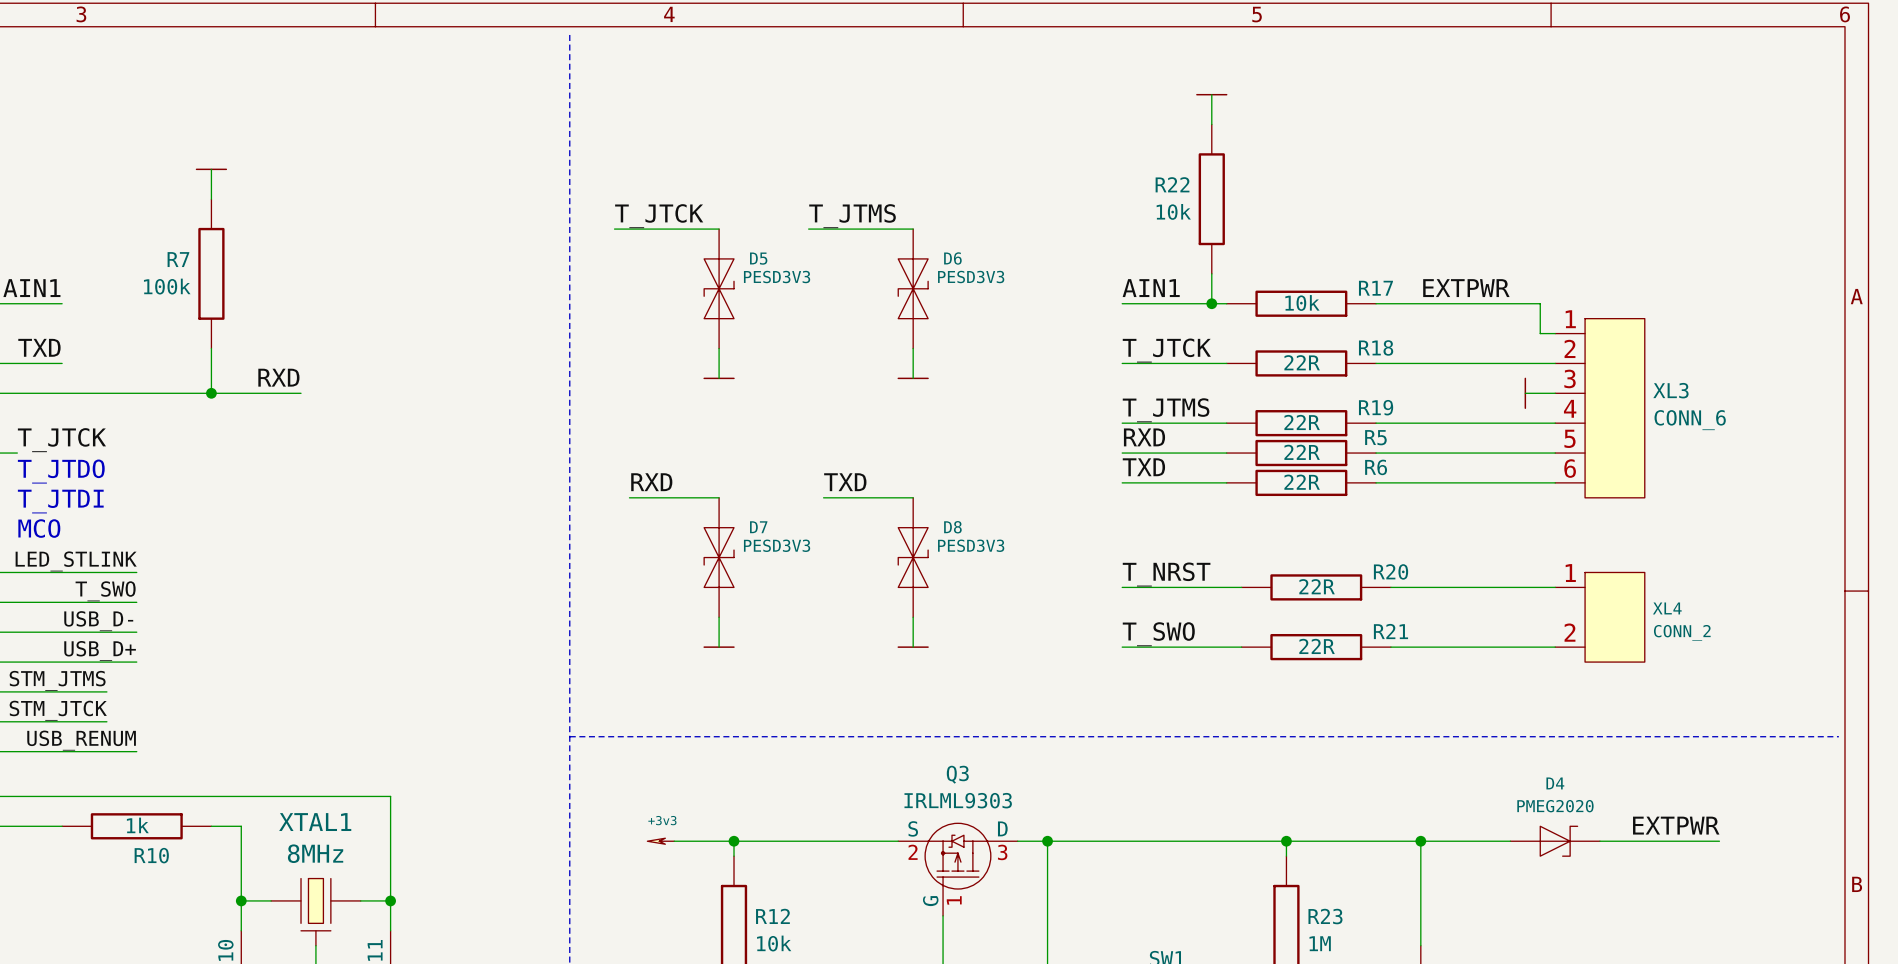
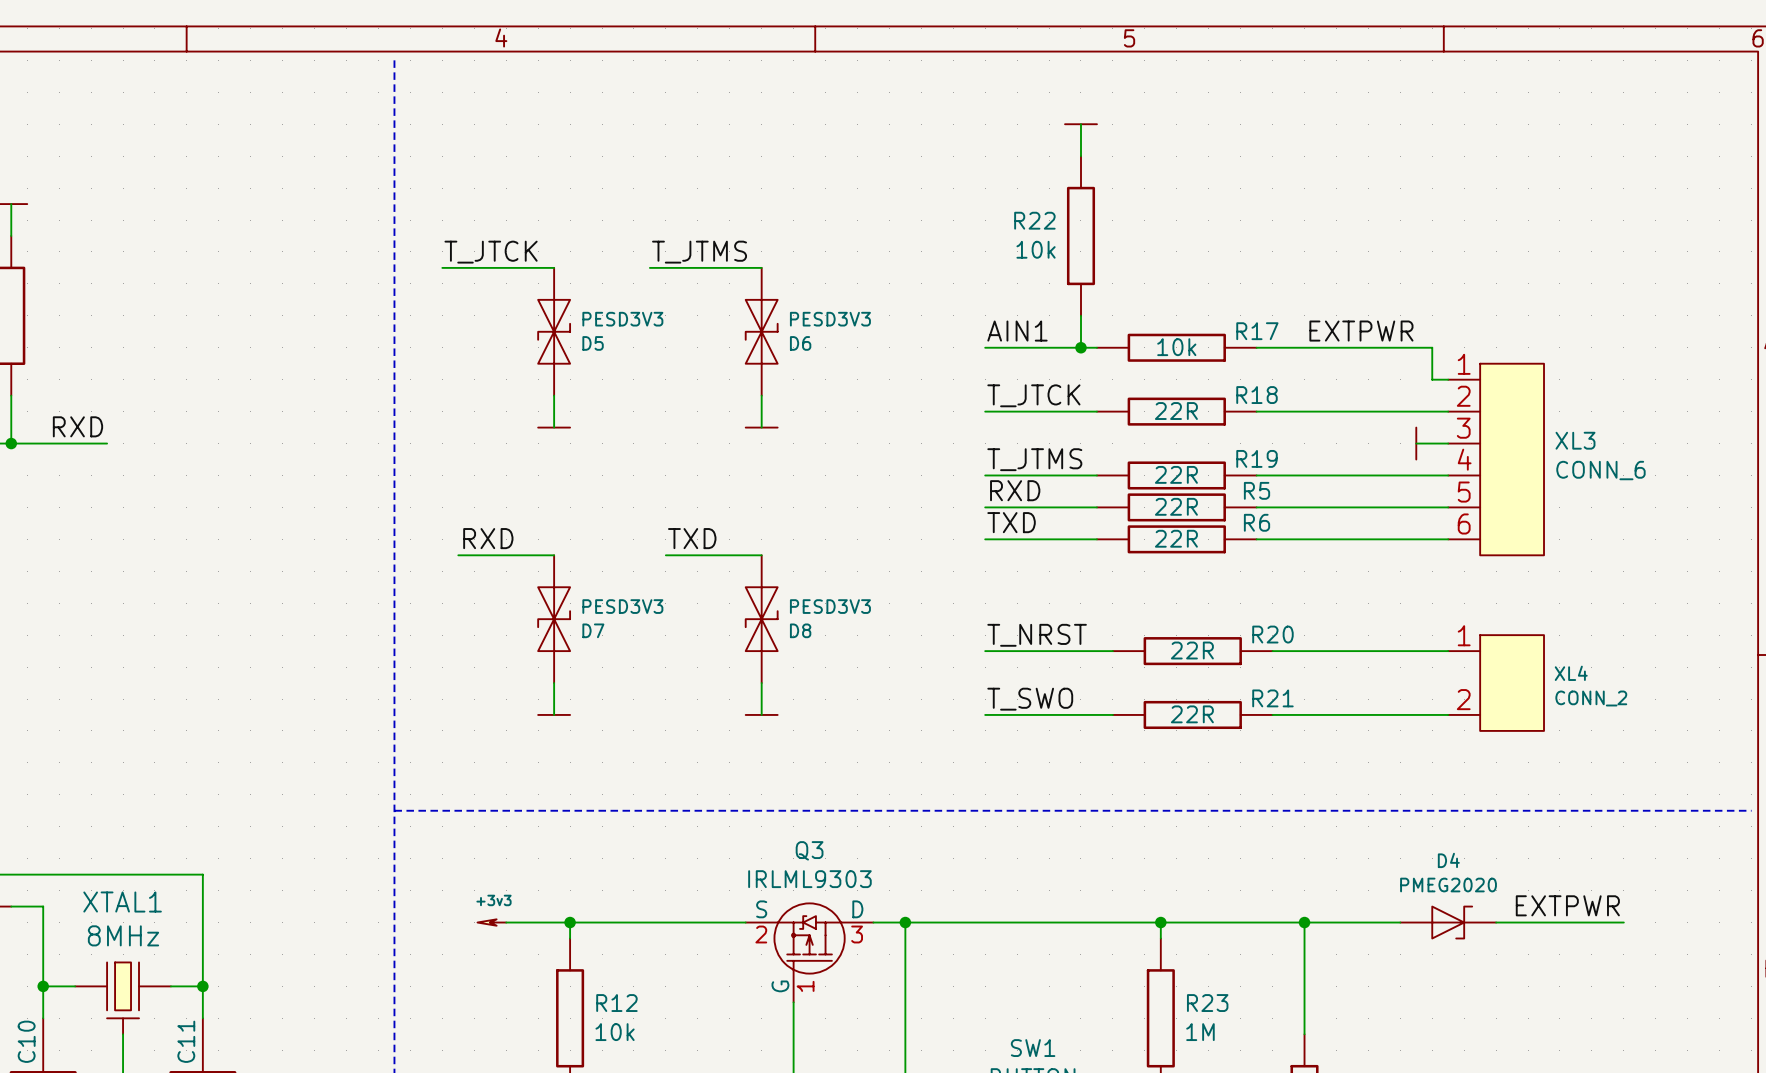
D5 name position: D5 (758, 258) -> D5 (593, 343)
D6 name position: D6 (952, 258) -> D6 (800, 343)
D7 name position: D7 (758, 527) -> D7 (593, 630)
D8 name position: D8 (952, 527) -> D8 (800, 630)

